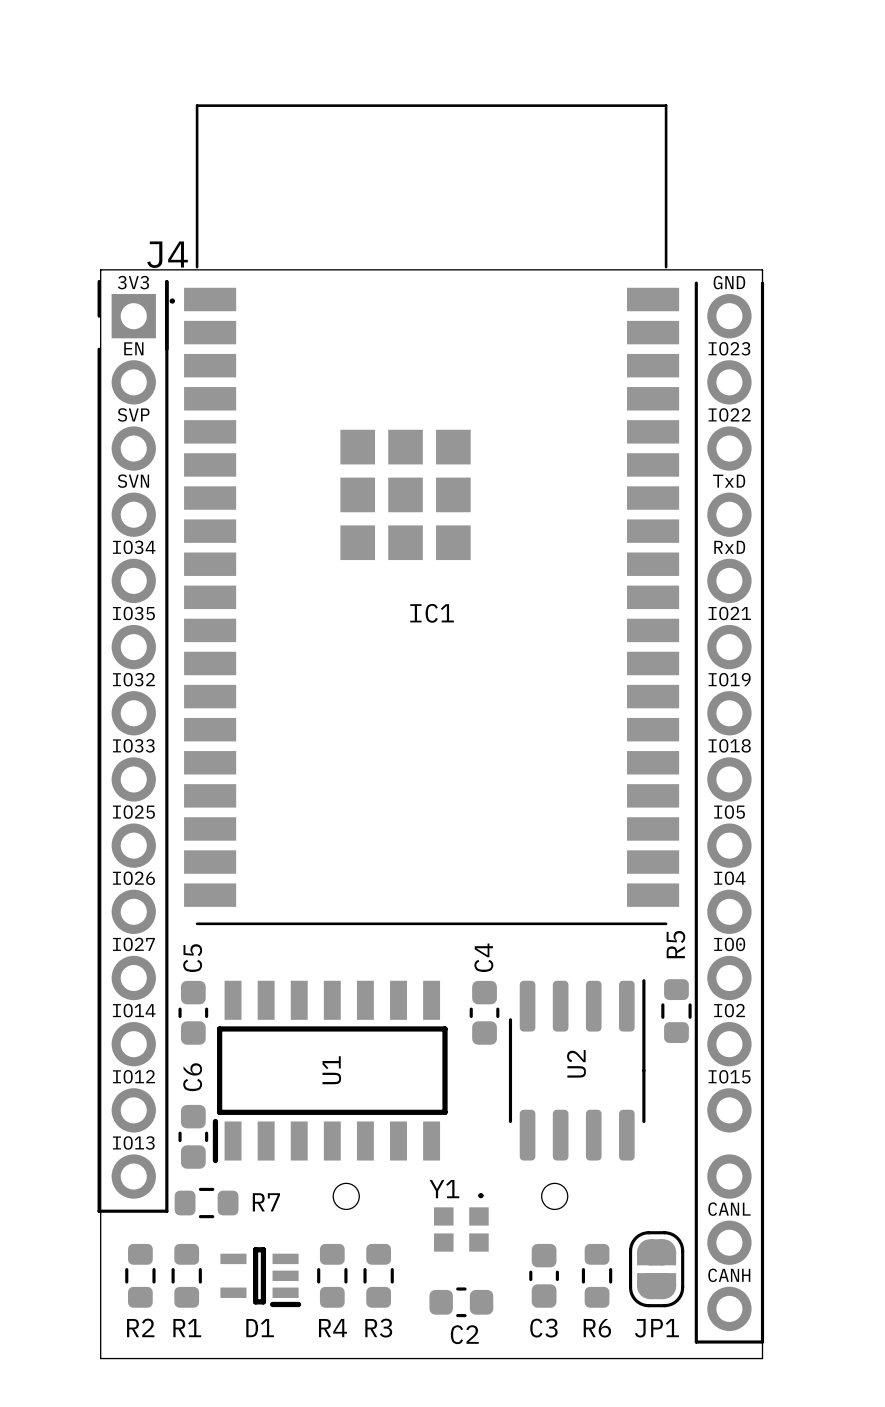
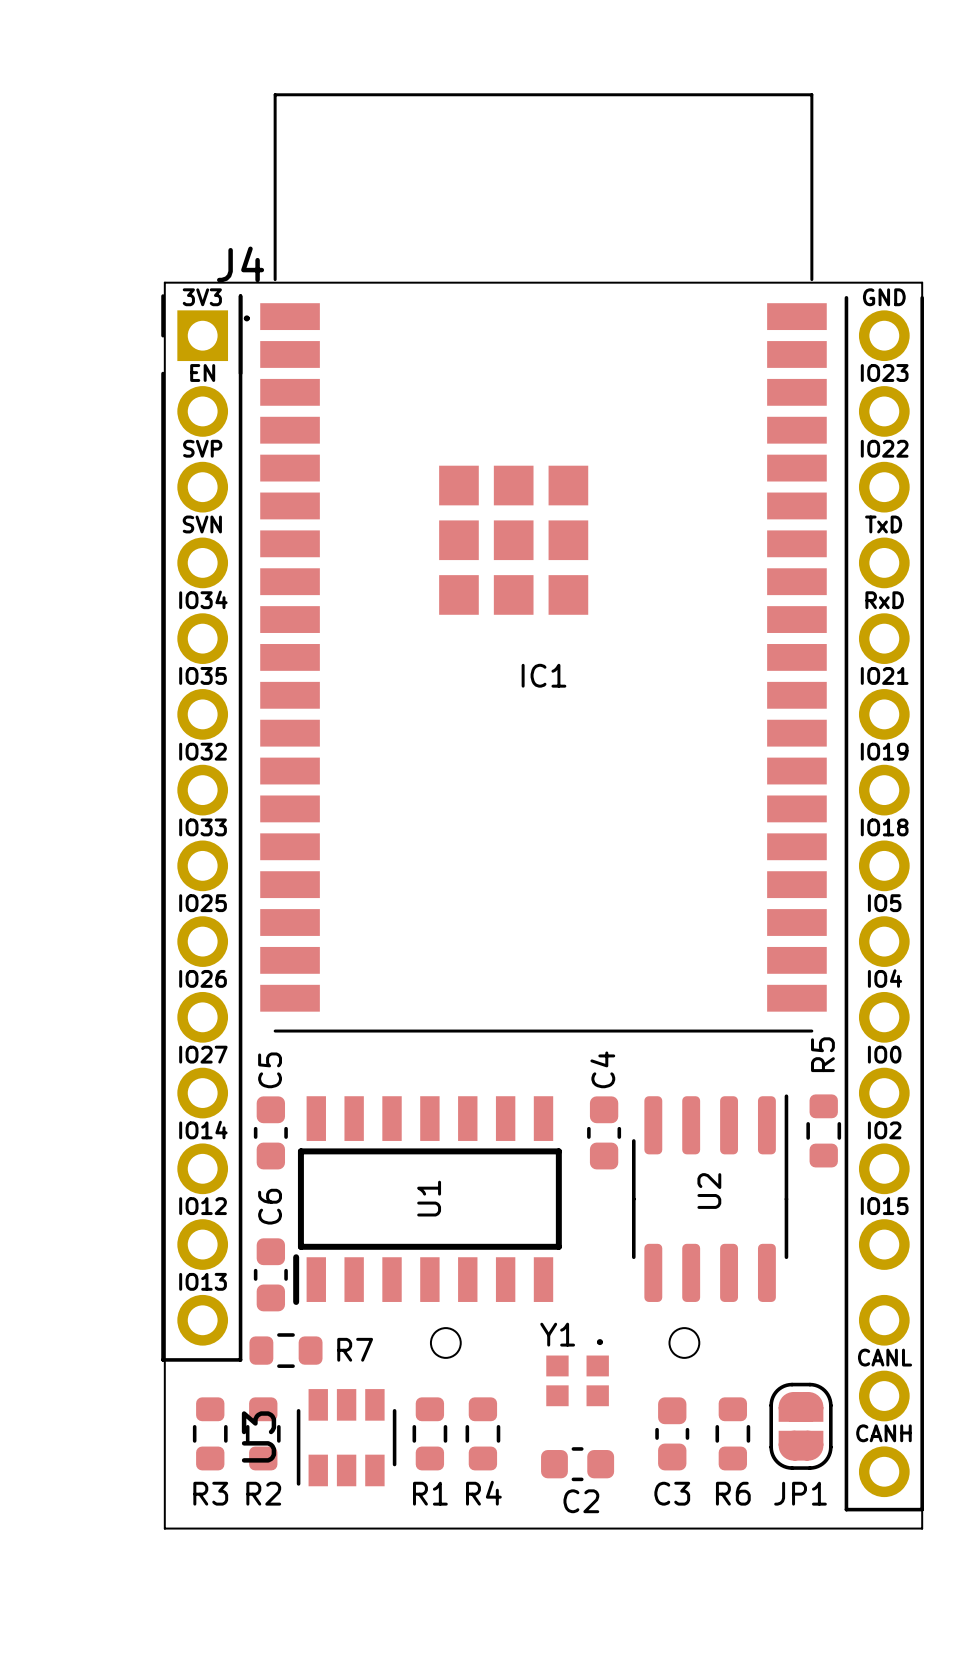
D1: (260, 1277) -> none
U3: none -> (346, 1437)
R2 name: R2 (140, 1327) -> R3 (210, 1493)
R1 name: R1 (187, 1328) -> R2 (263, 1493)
R4 name: R4 (332, 1328) -> R1 (430, 1493)
R3 name: R3 (378, 1328) -> R4 (483, 1493)

